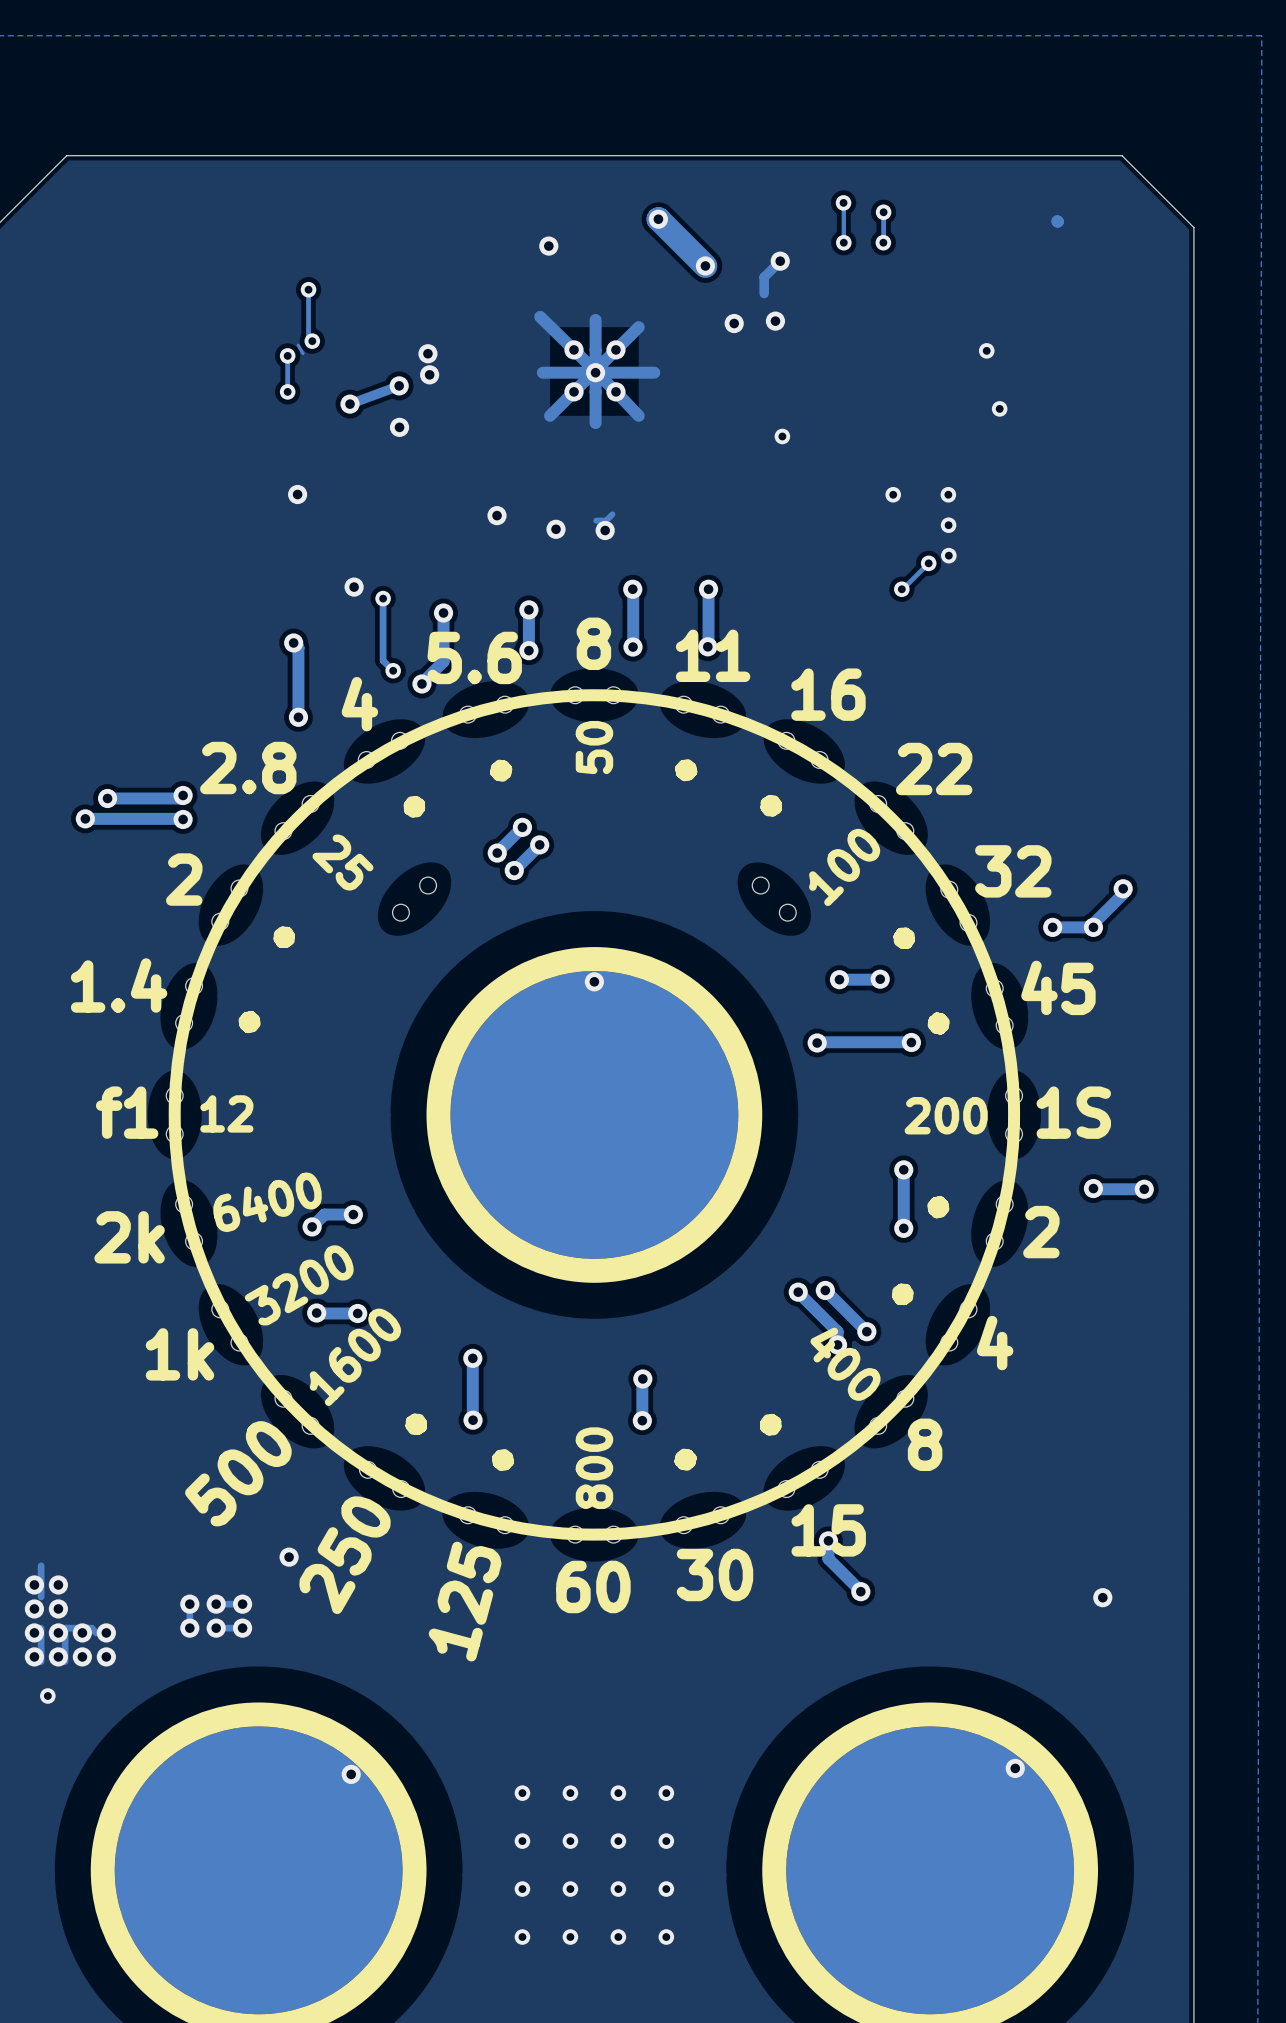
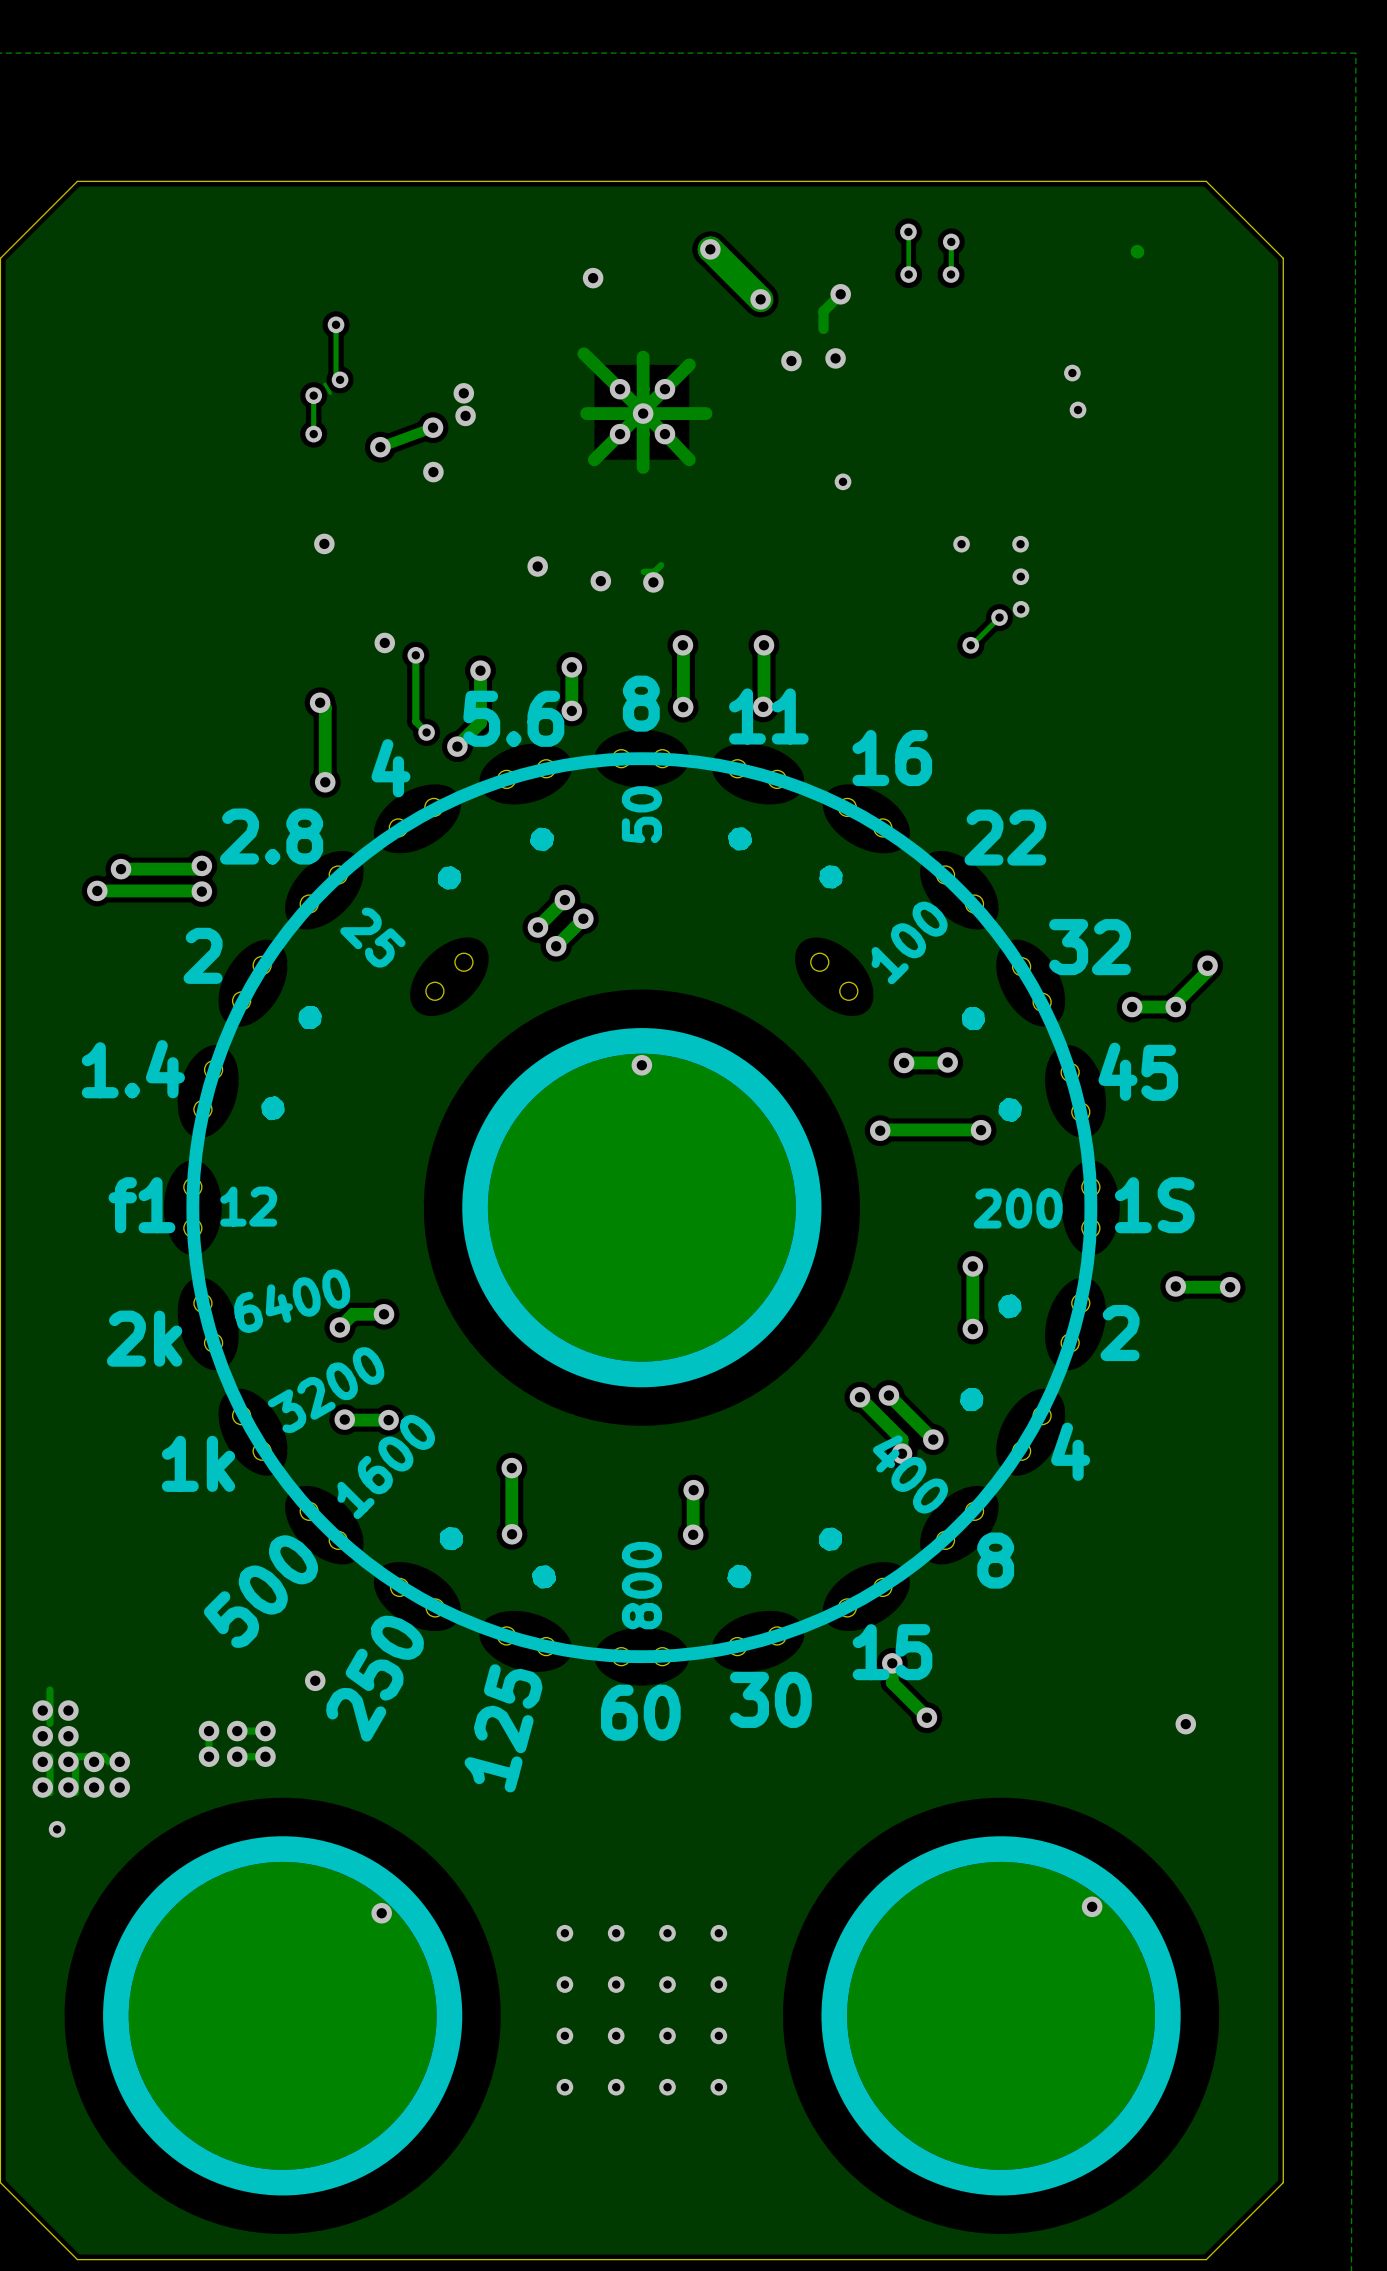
via: none -> (1072, 373)
via: (986, 350) -> none
via: none -> (1078, 409)
via: (999, 408) -> none

